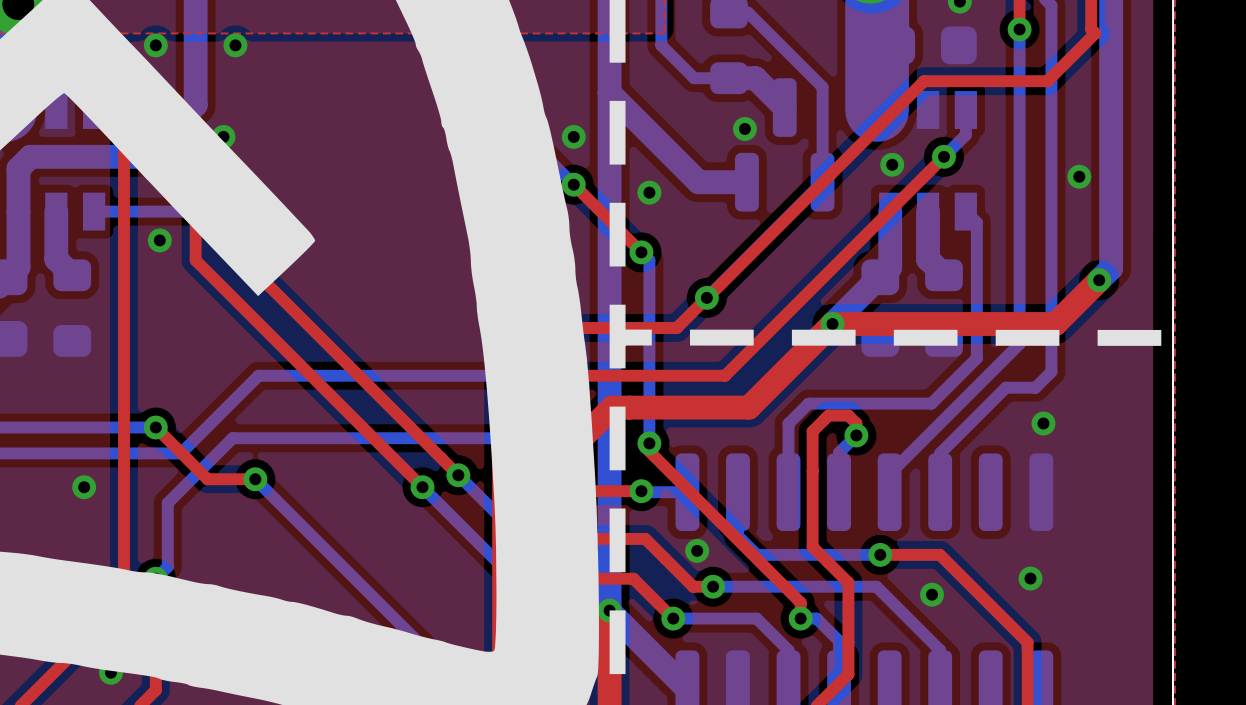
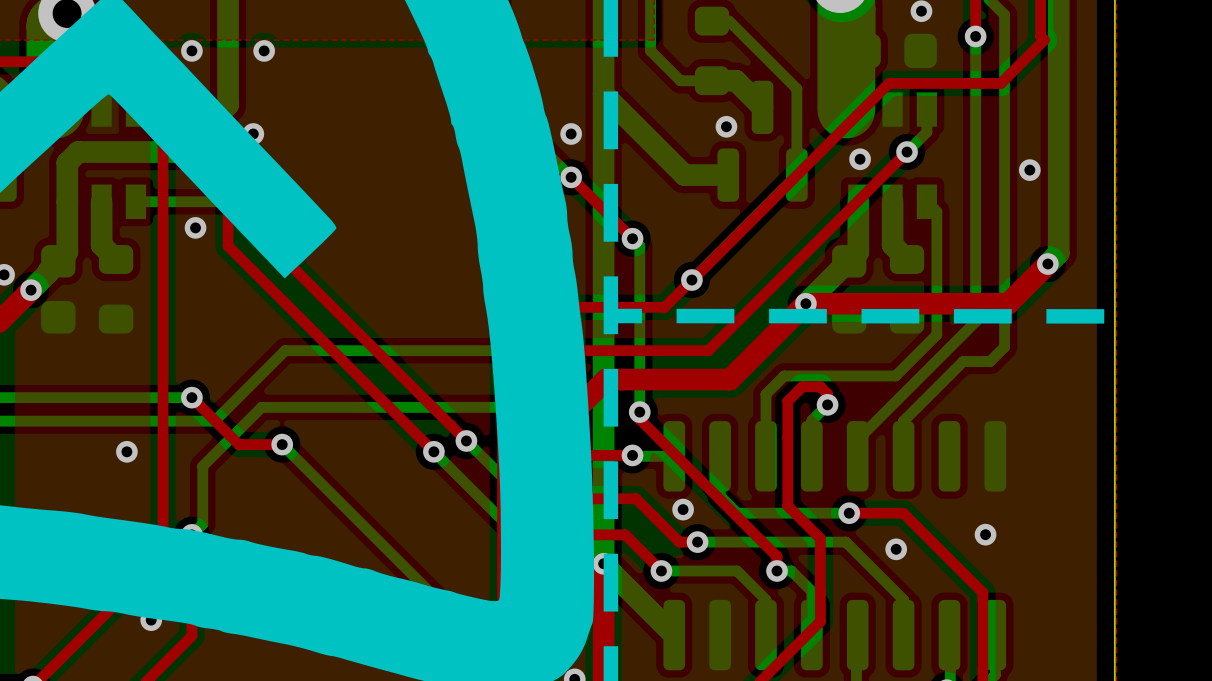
via: (649, 192) -> none
via: (1043, 423) -> none

